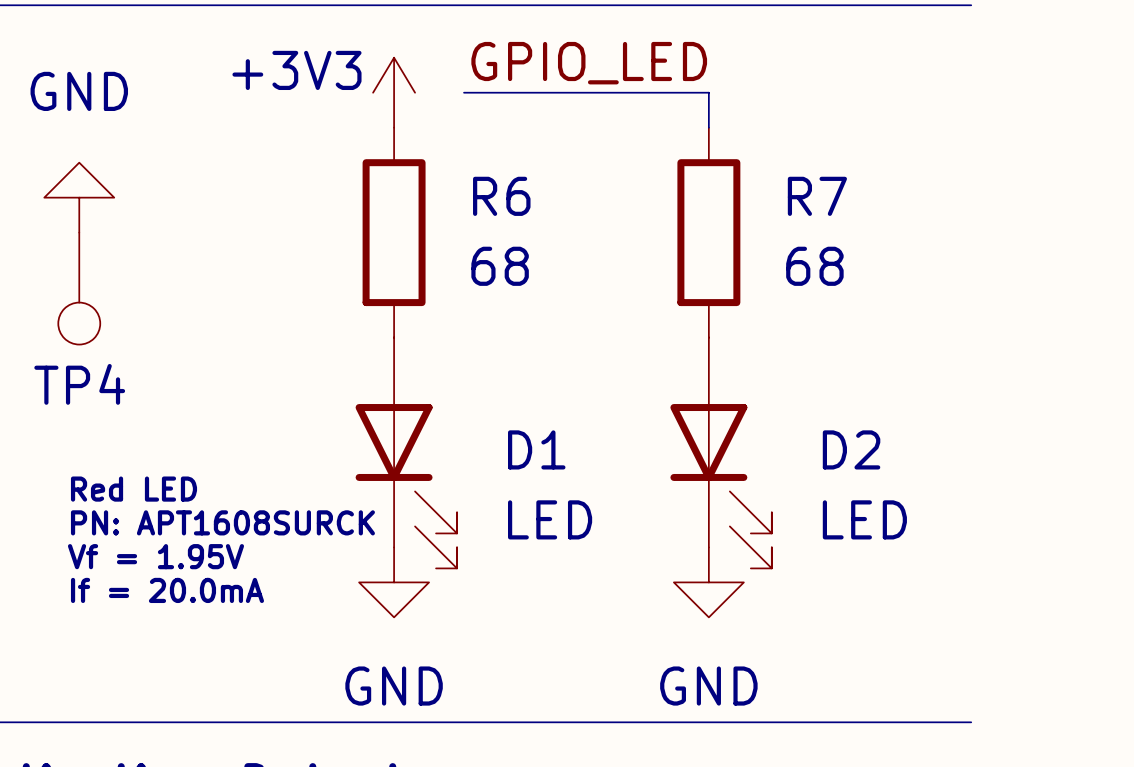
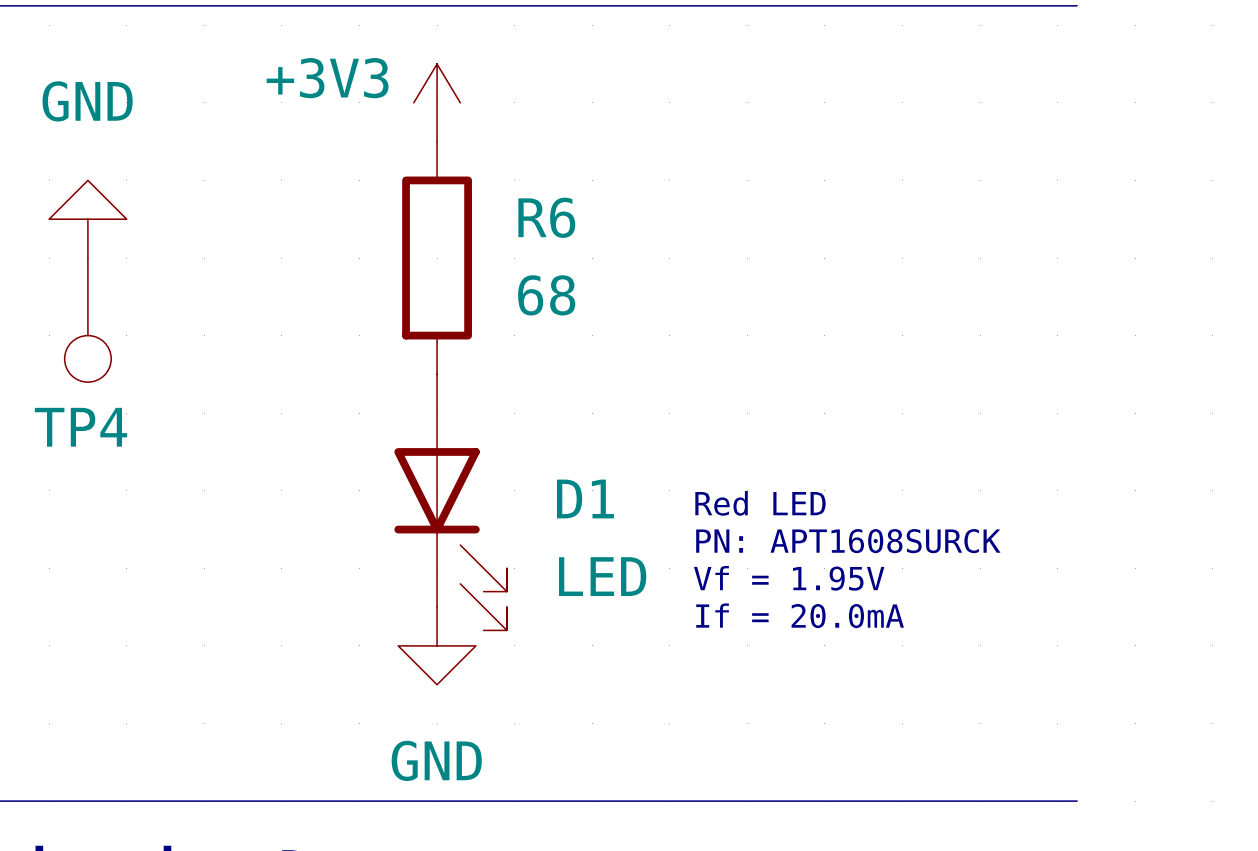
label: GPIO_LED (589, 63) -> none
wire: (464, 92) (708, 92) (708, 127) -> none
R7: 68 (708, 232) -> none
D2: LED (721, 452) -> none
text position: Red LED (134, 489) -> Red LED (760, 503)
text position: PN: APT1608SURCK (222, 522) -> PN: APT1608SURCK (848, 541)
text position: Vf = 1.95V (155, 556) -> Vf = 1.95V (789, 578)
power symbol: GND (708, 582) -> none
text position: If = 20.0mA (167, 590) -> If = 20.0mA (800, 615)

